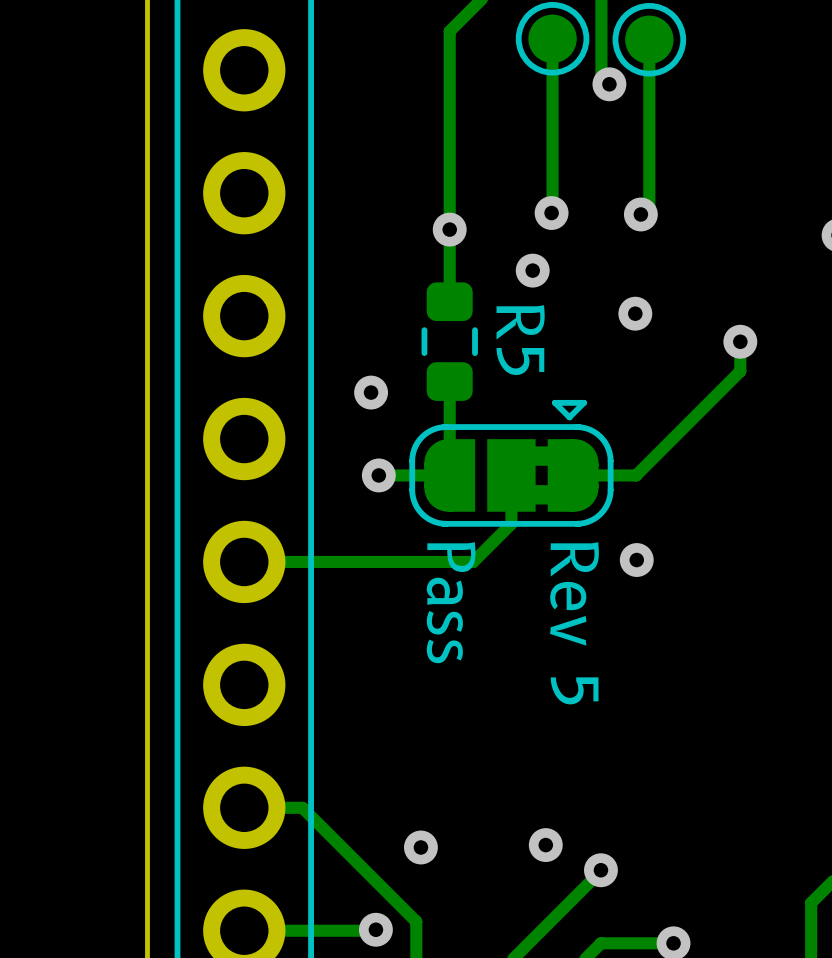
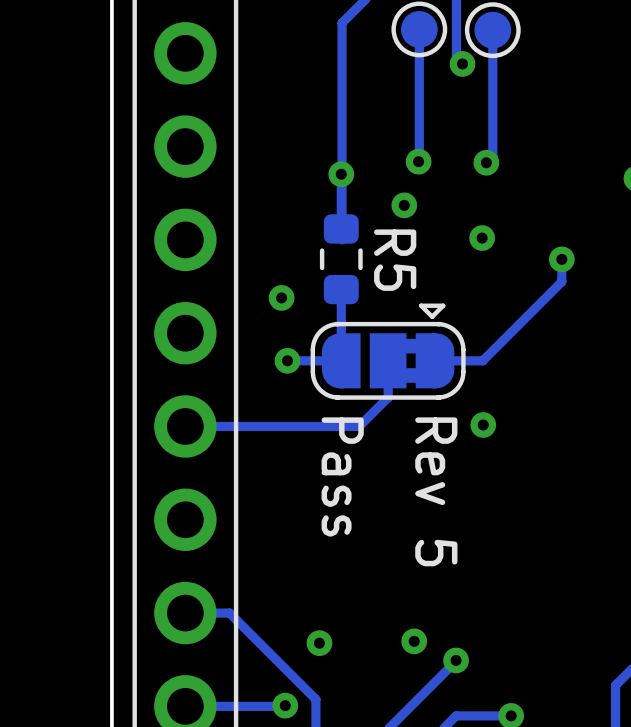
track: (450, 30) (449, 229) -> (342, 23) (342, 239)

